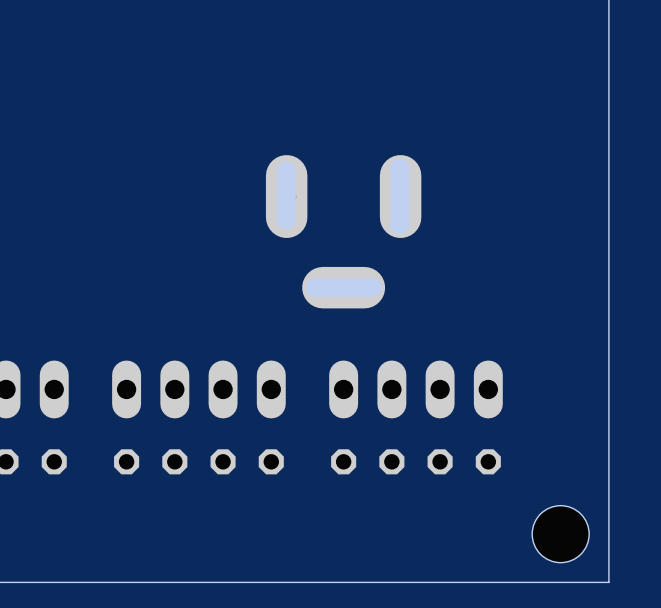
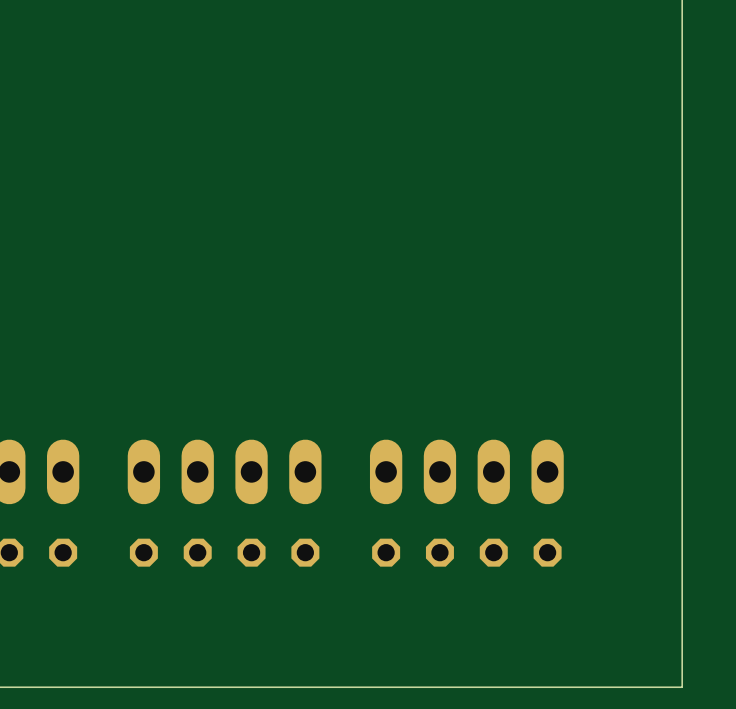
part: (343, 231) -> none
hole: (560, 534) -> none

